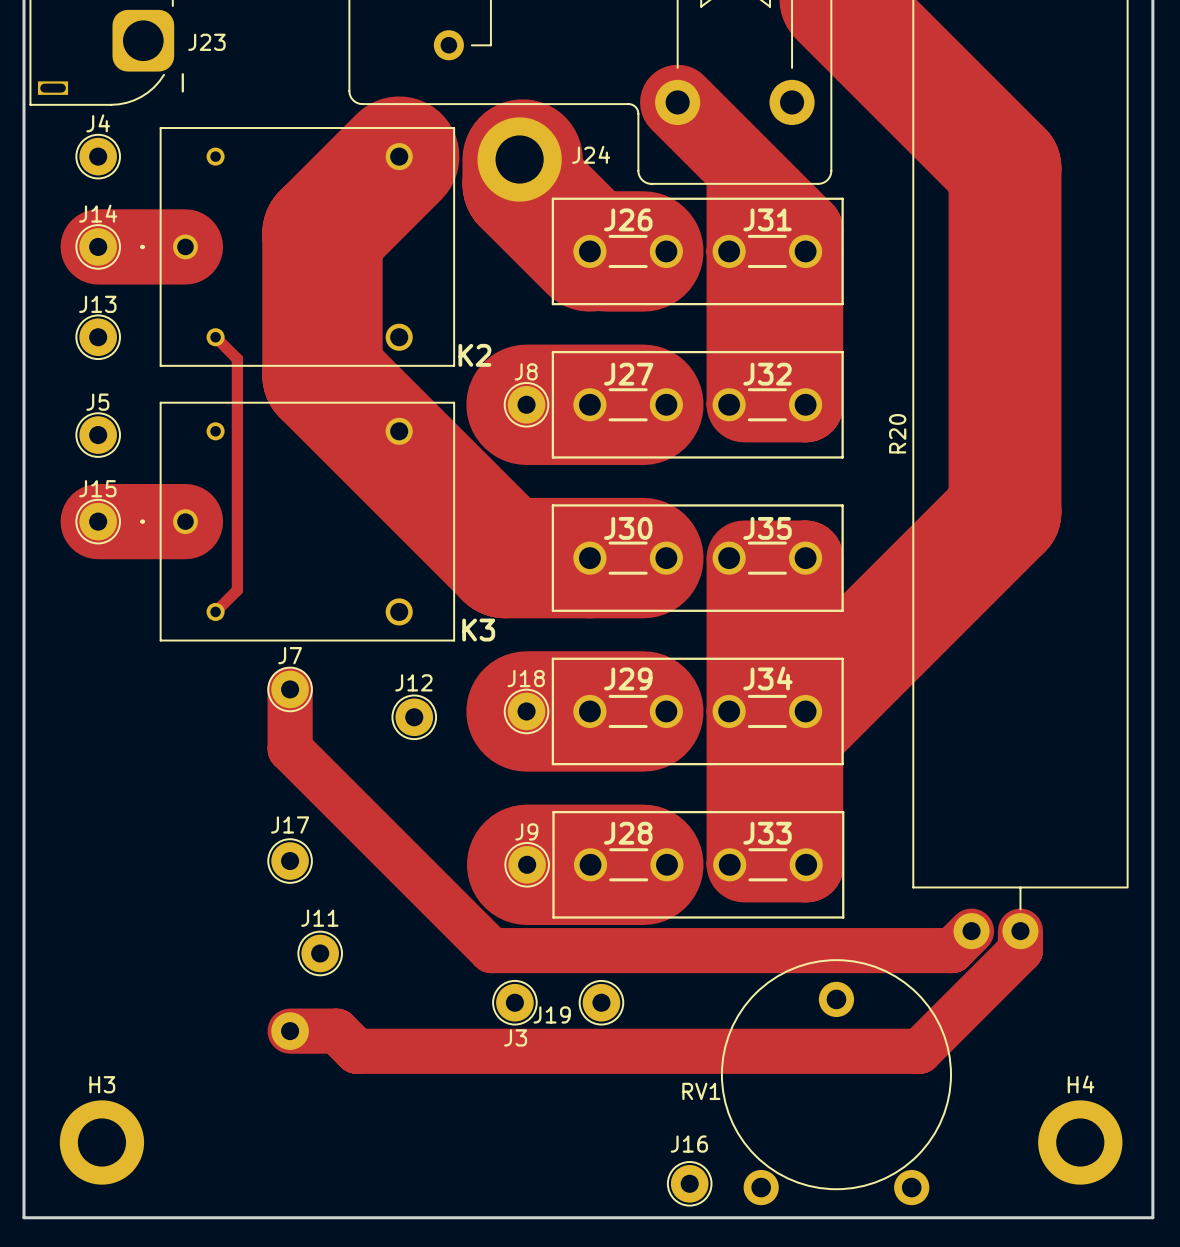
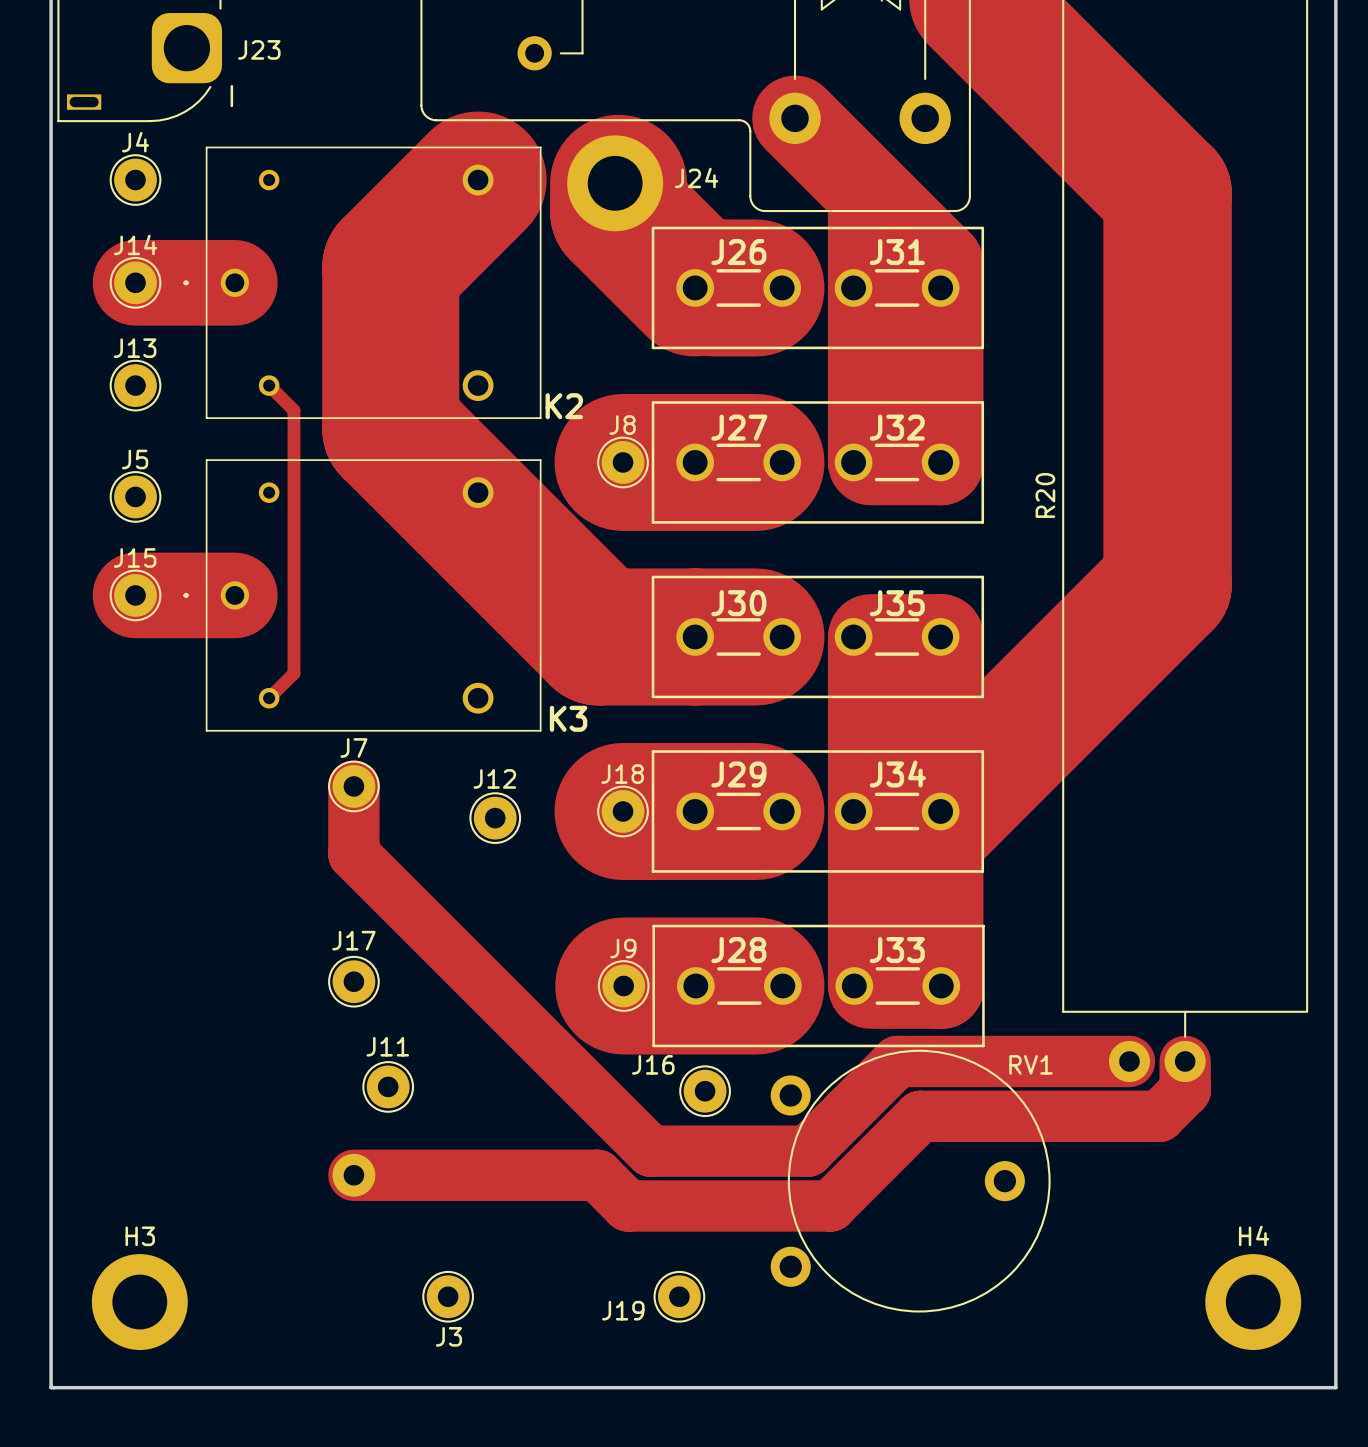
track: (971, 931) (952, 950) (491, 950) -> (1129, 1061) (897, 1061) (807, 1151) (650, 1151) (583, 1083)
track: (1020, 950) (919, 1051) (356, 1051) (336, 1031) -> (1185, 1083) (1185, 1090) (1159, 1116) (920, 1116) (830, 1205) (628, 1205) (597, 1175) (406, 1175)
J3 position: (514, 1002) -> (448, 1296)
J19 position: (601, 1002) -> (679, 1296)
RV1 rotation: 0° (836, 1082) -> 90° clockwise (910, 1181)
RV1 name position: RV1 (701, 1091) -> RV1 (1030, 1064)
J16 name position: J16 (689, 1144) -> J16 (653, 1064)
J16 position: (689, 1183) -> (705, 1091)

